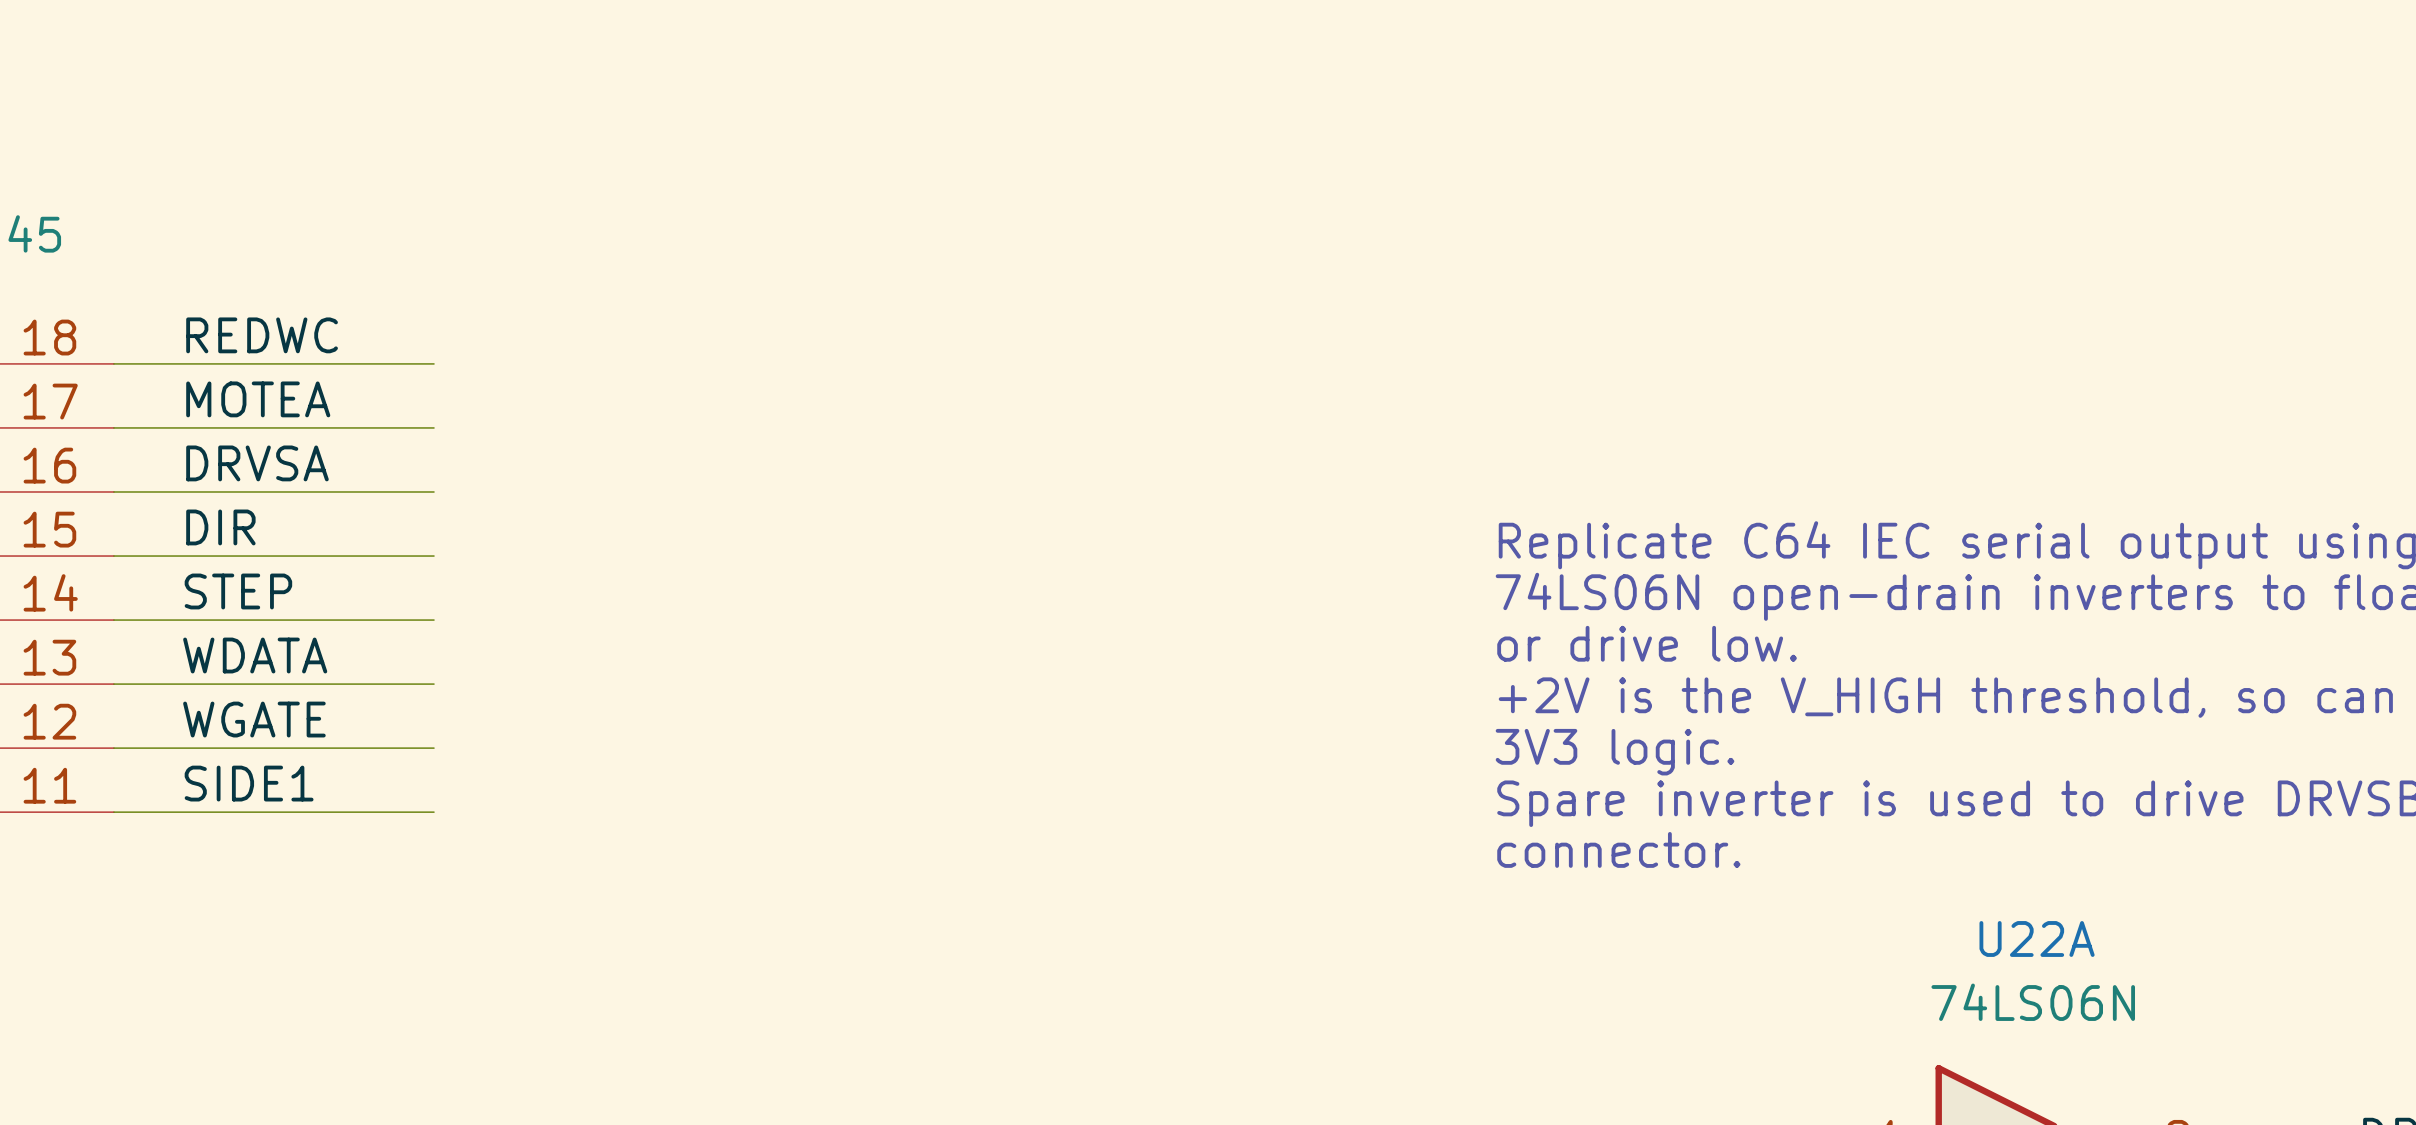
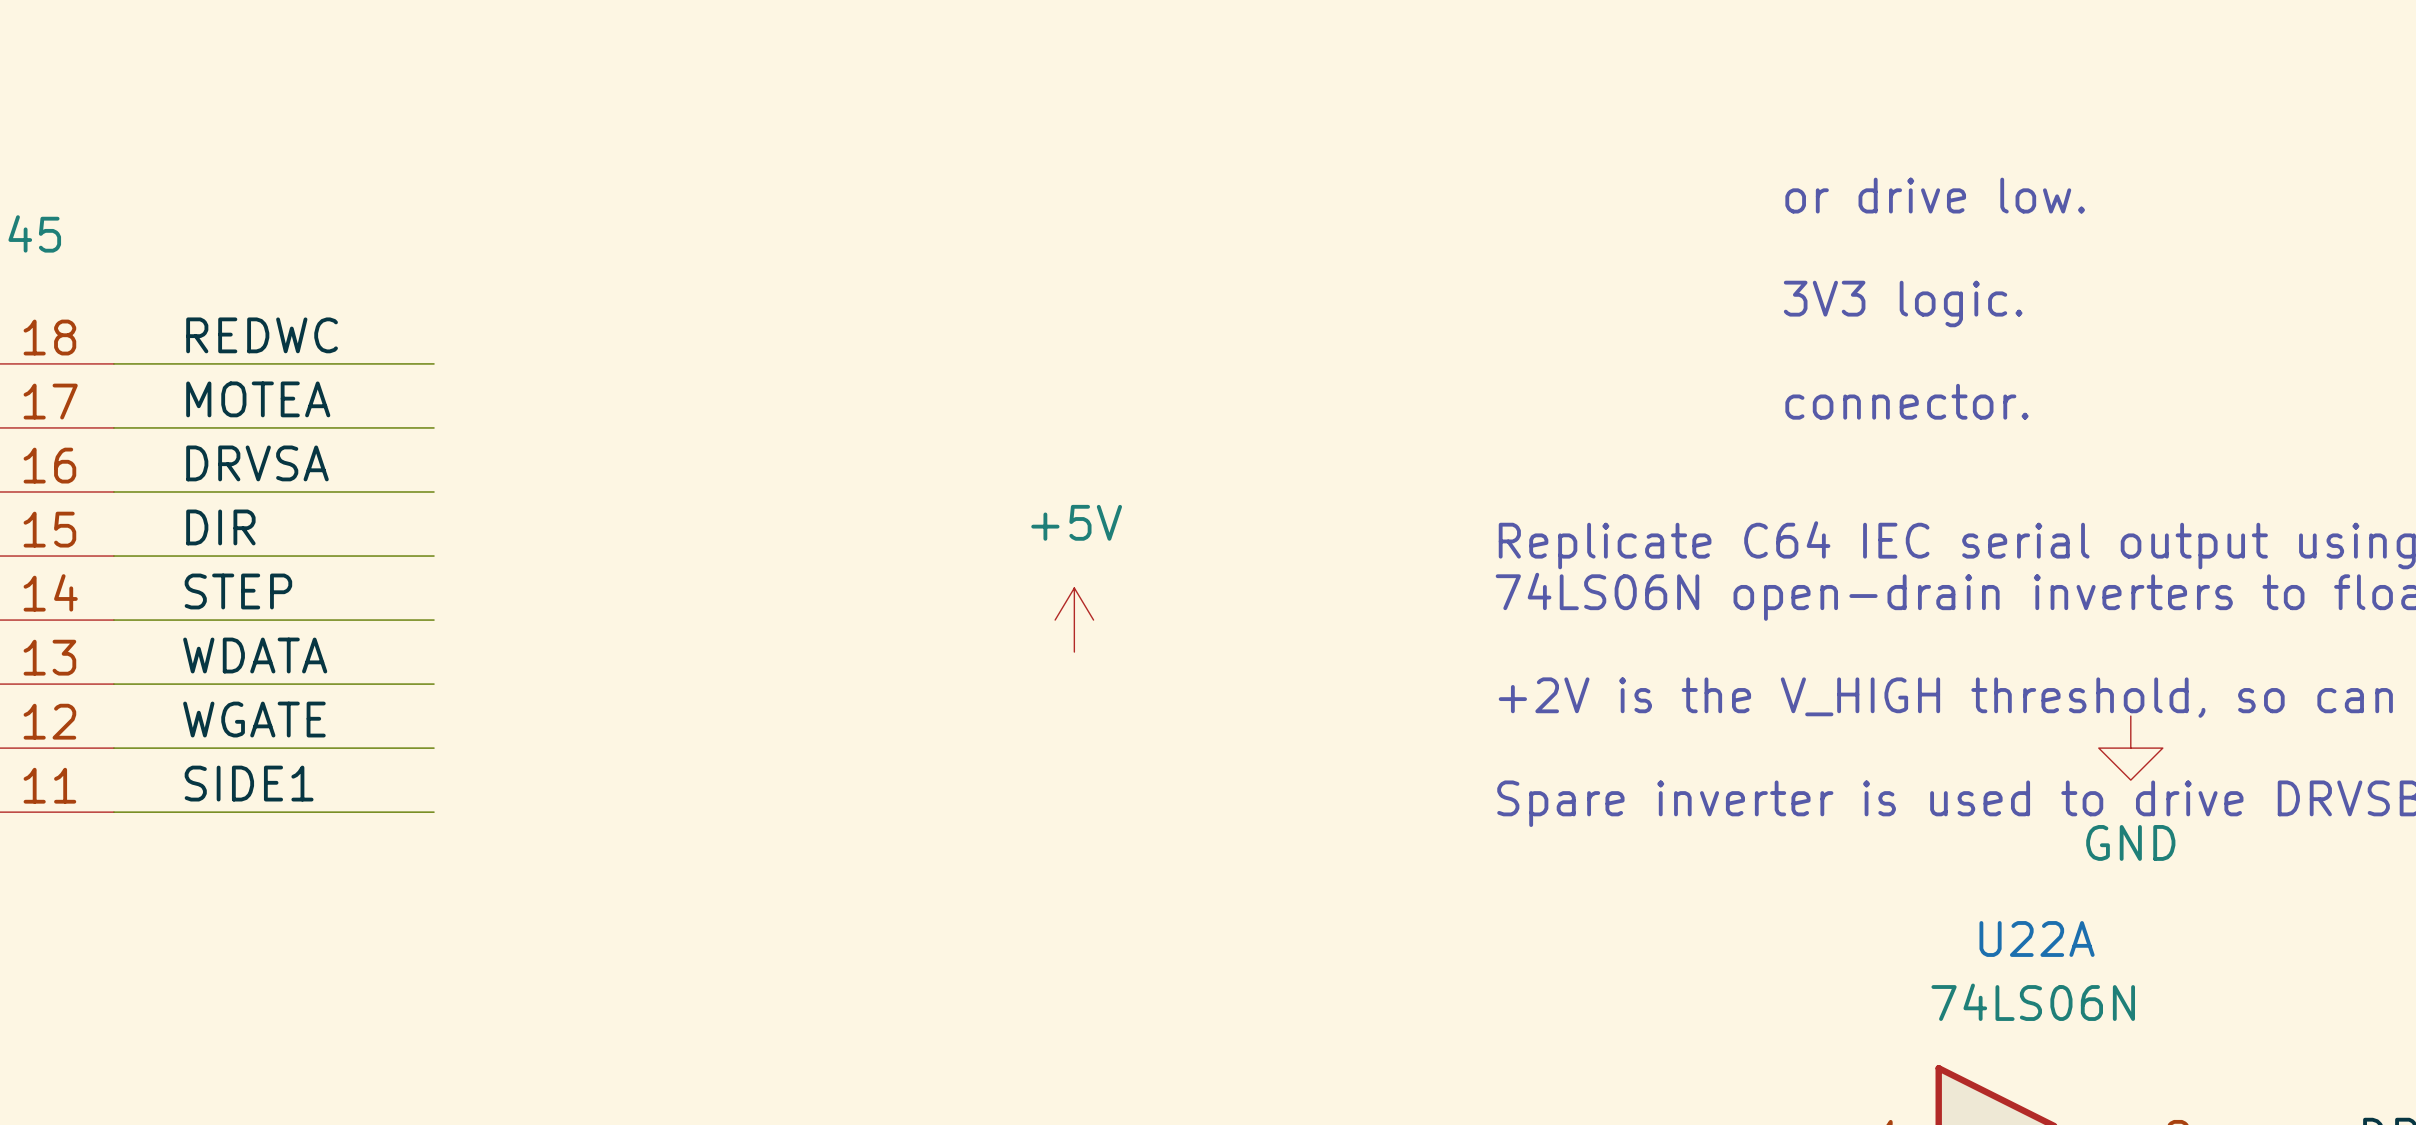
power symbol: none -> +5V (1074, 620)
text position: or drive low. (1647, 643) -> or drive low. (1935, 195)
power symbol: none -> GND (2130, 748)
text position: 3V3 logic. (1615, 752) -> 3V3 logic. (1903, 303)
text position: connector. (1618, 849) -> connector. (1906, 401)

